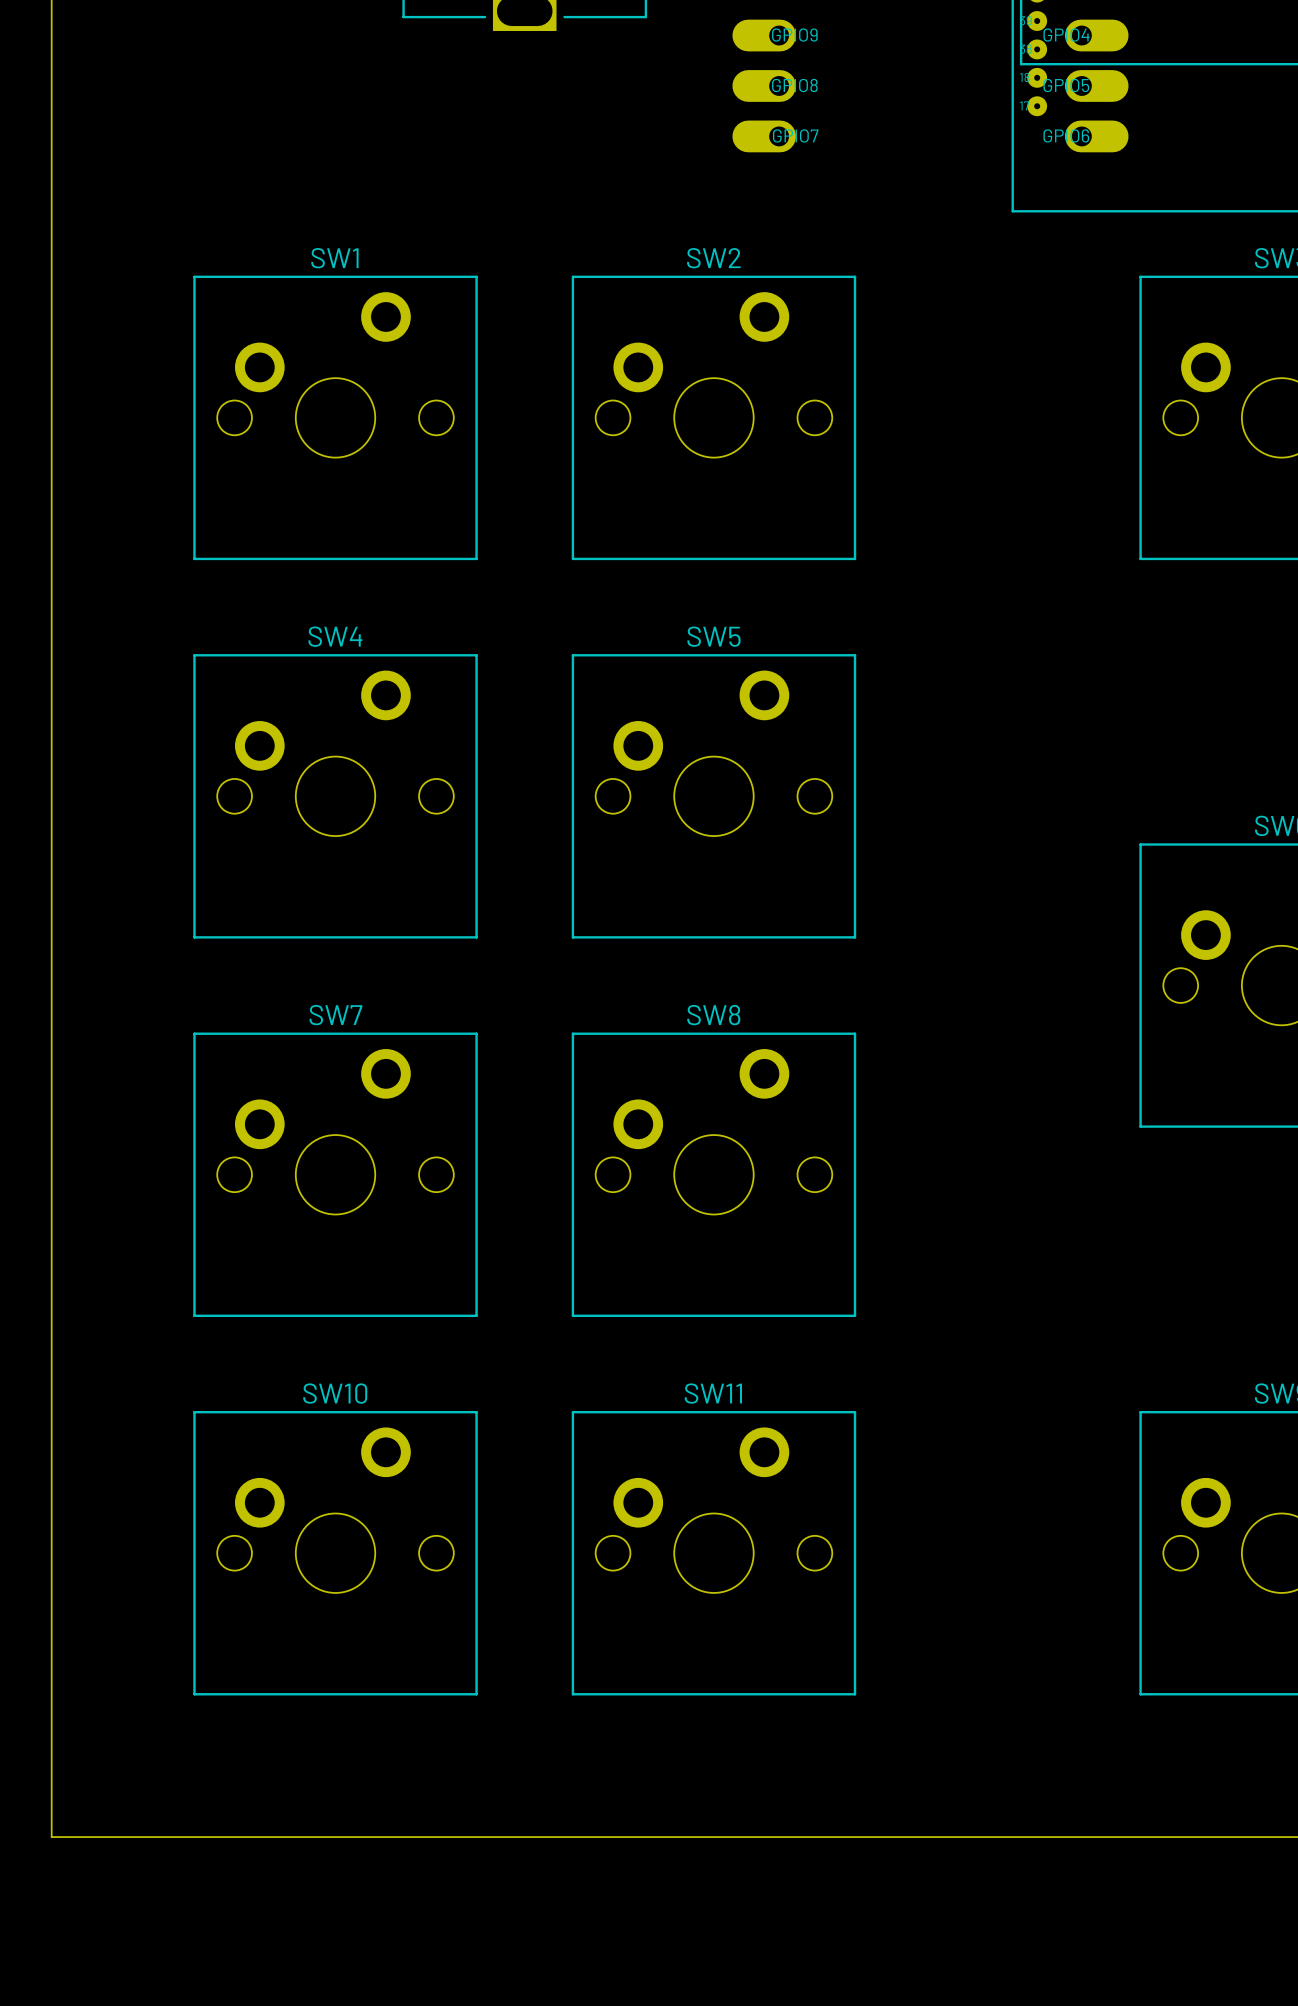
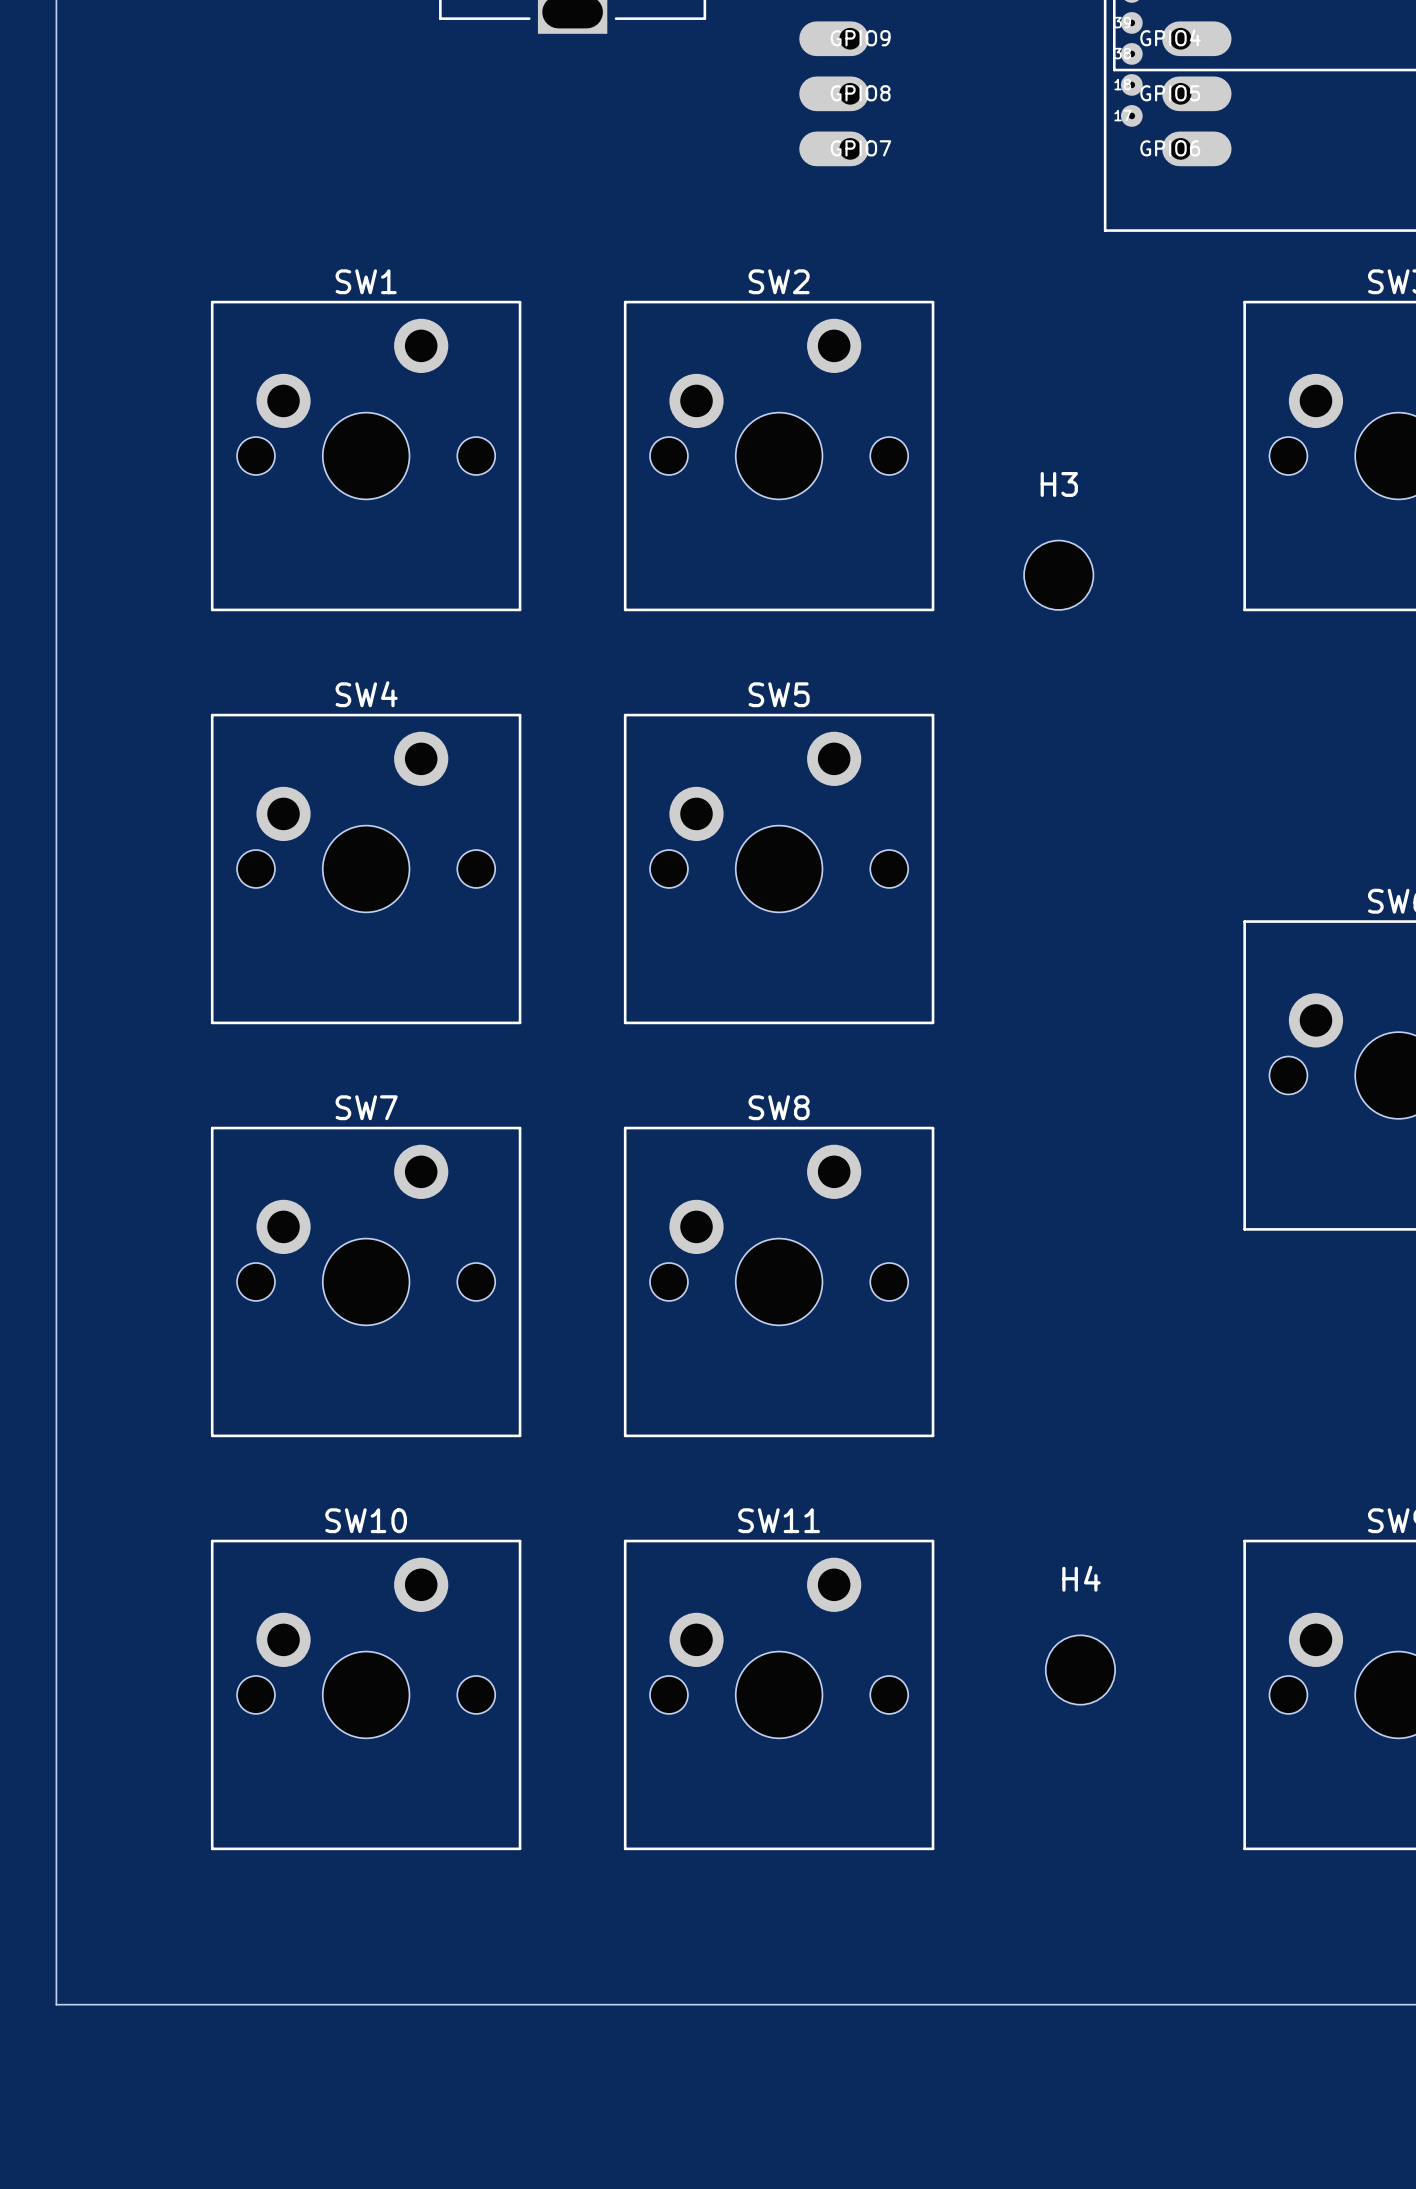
H3: none -> (1058, 575)
H4: none -> (1080, 1670)

